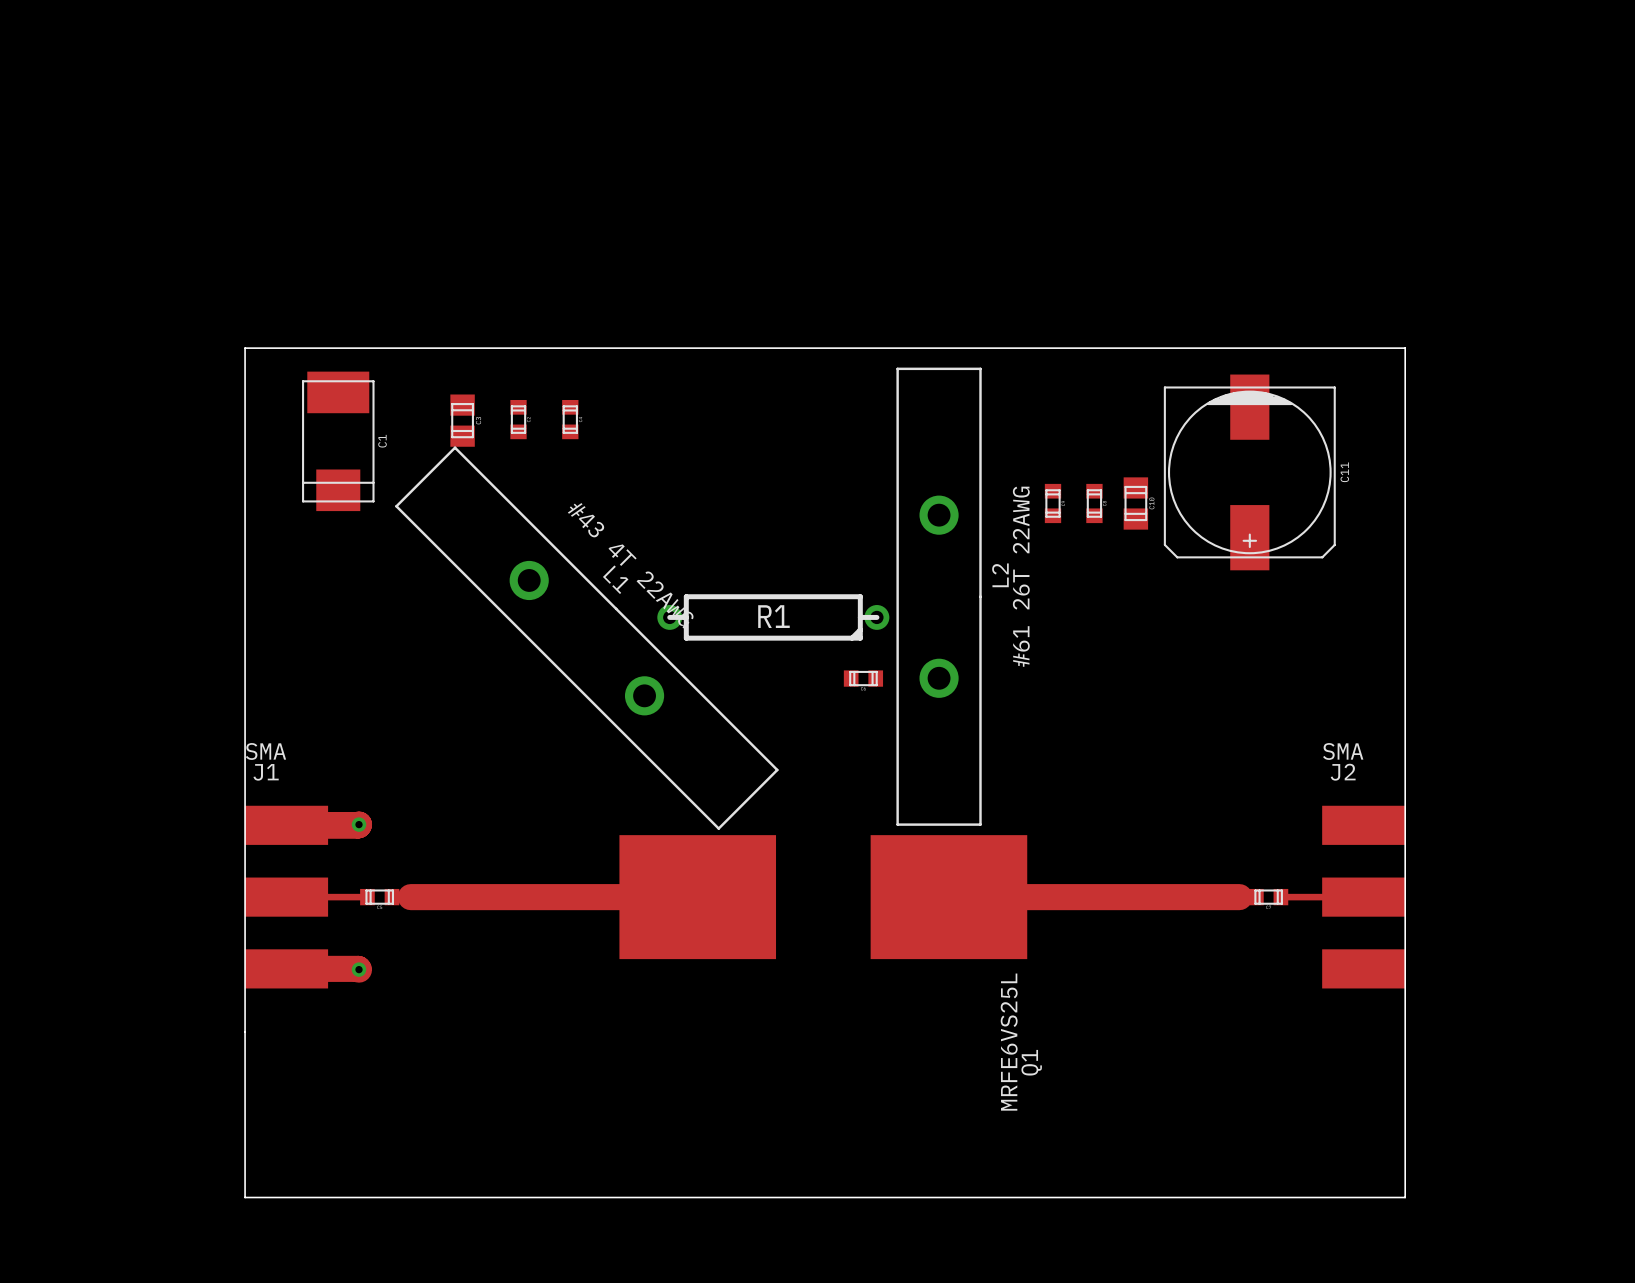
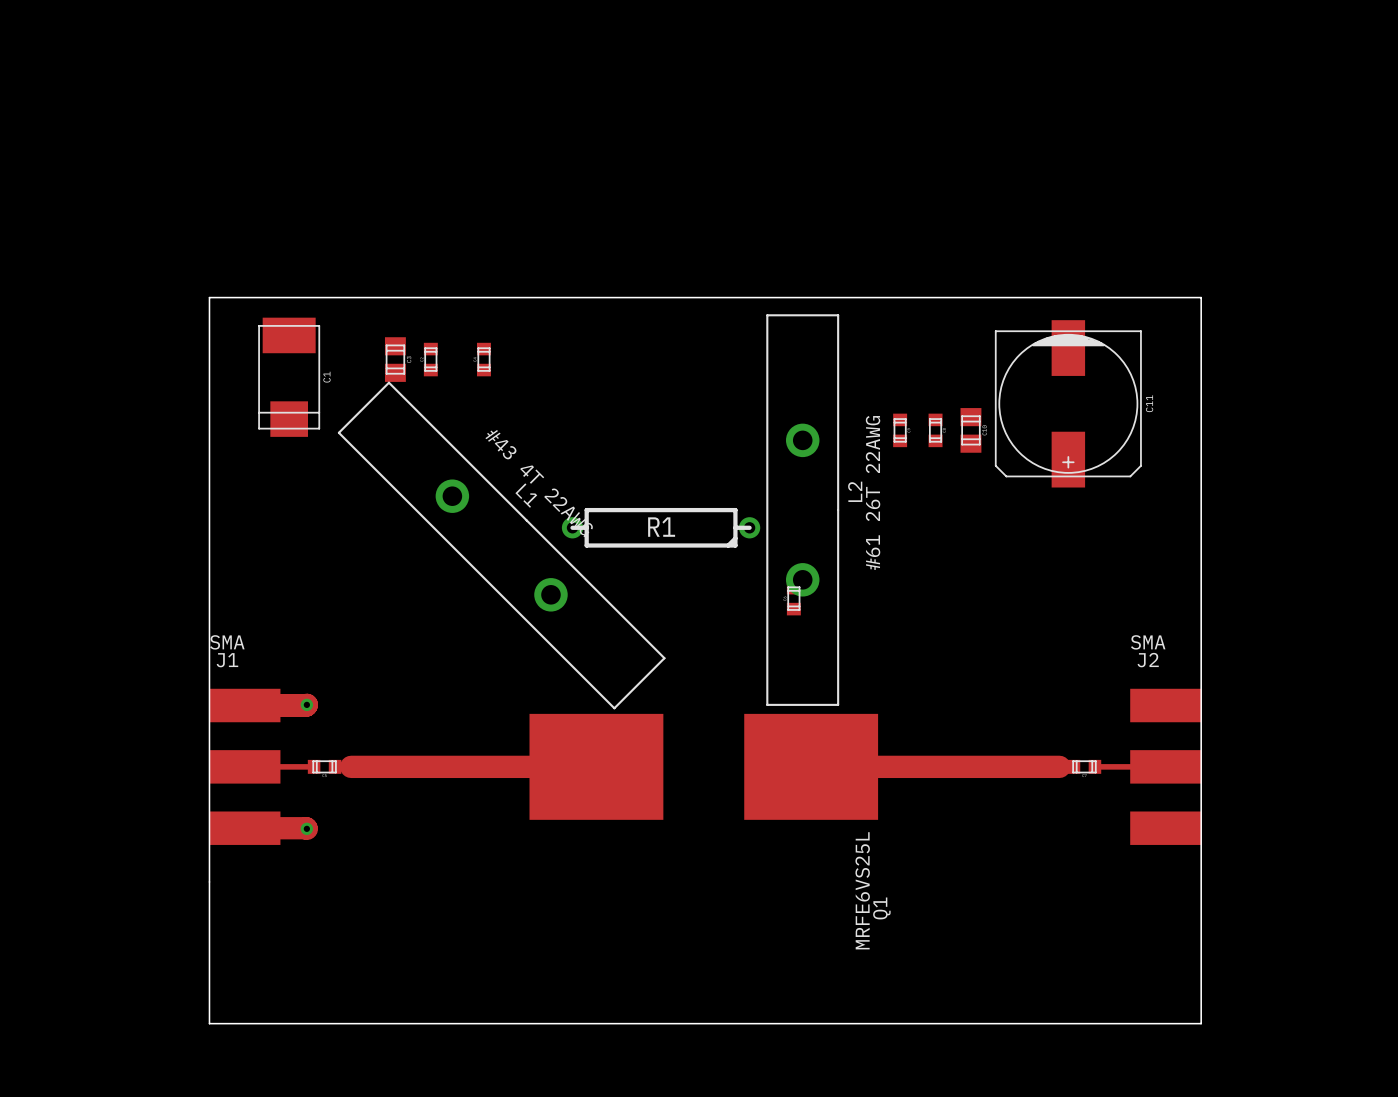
part rotation: 0° (518, 419) -> 180° (430, 359)
part rotation: 0° (570, 419) -> 180° (483, 359)
part rotation: 0° (863, 678) -> 90° clockwise (793, 598)
part position: (863, 678) -> (793, 598)

